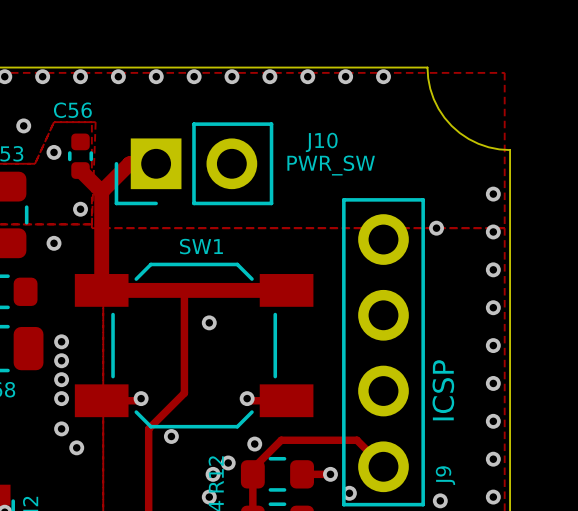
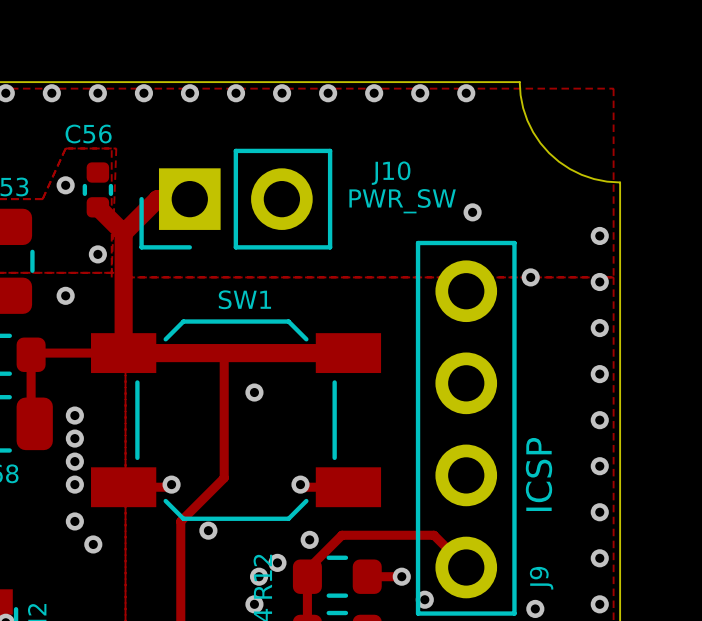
via: (23, 125) -> none
via: none -> (472, 212)
track: none -> (123, 353) (32, 353) (31, 354) (31, 420) (34, 423)

